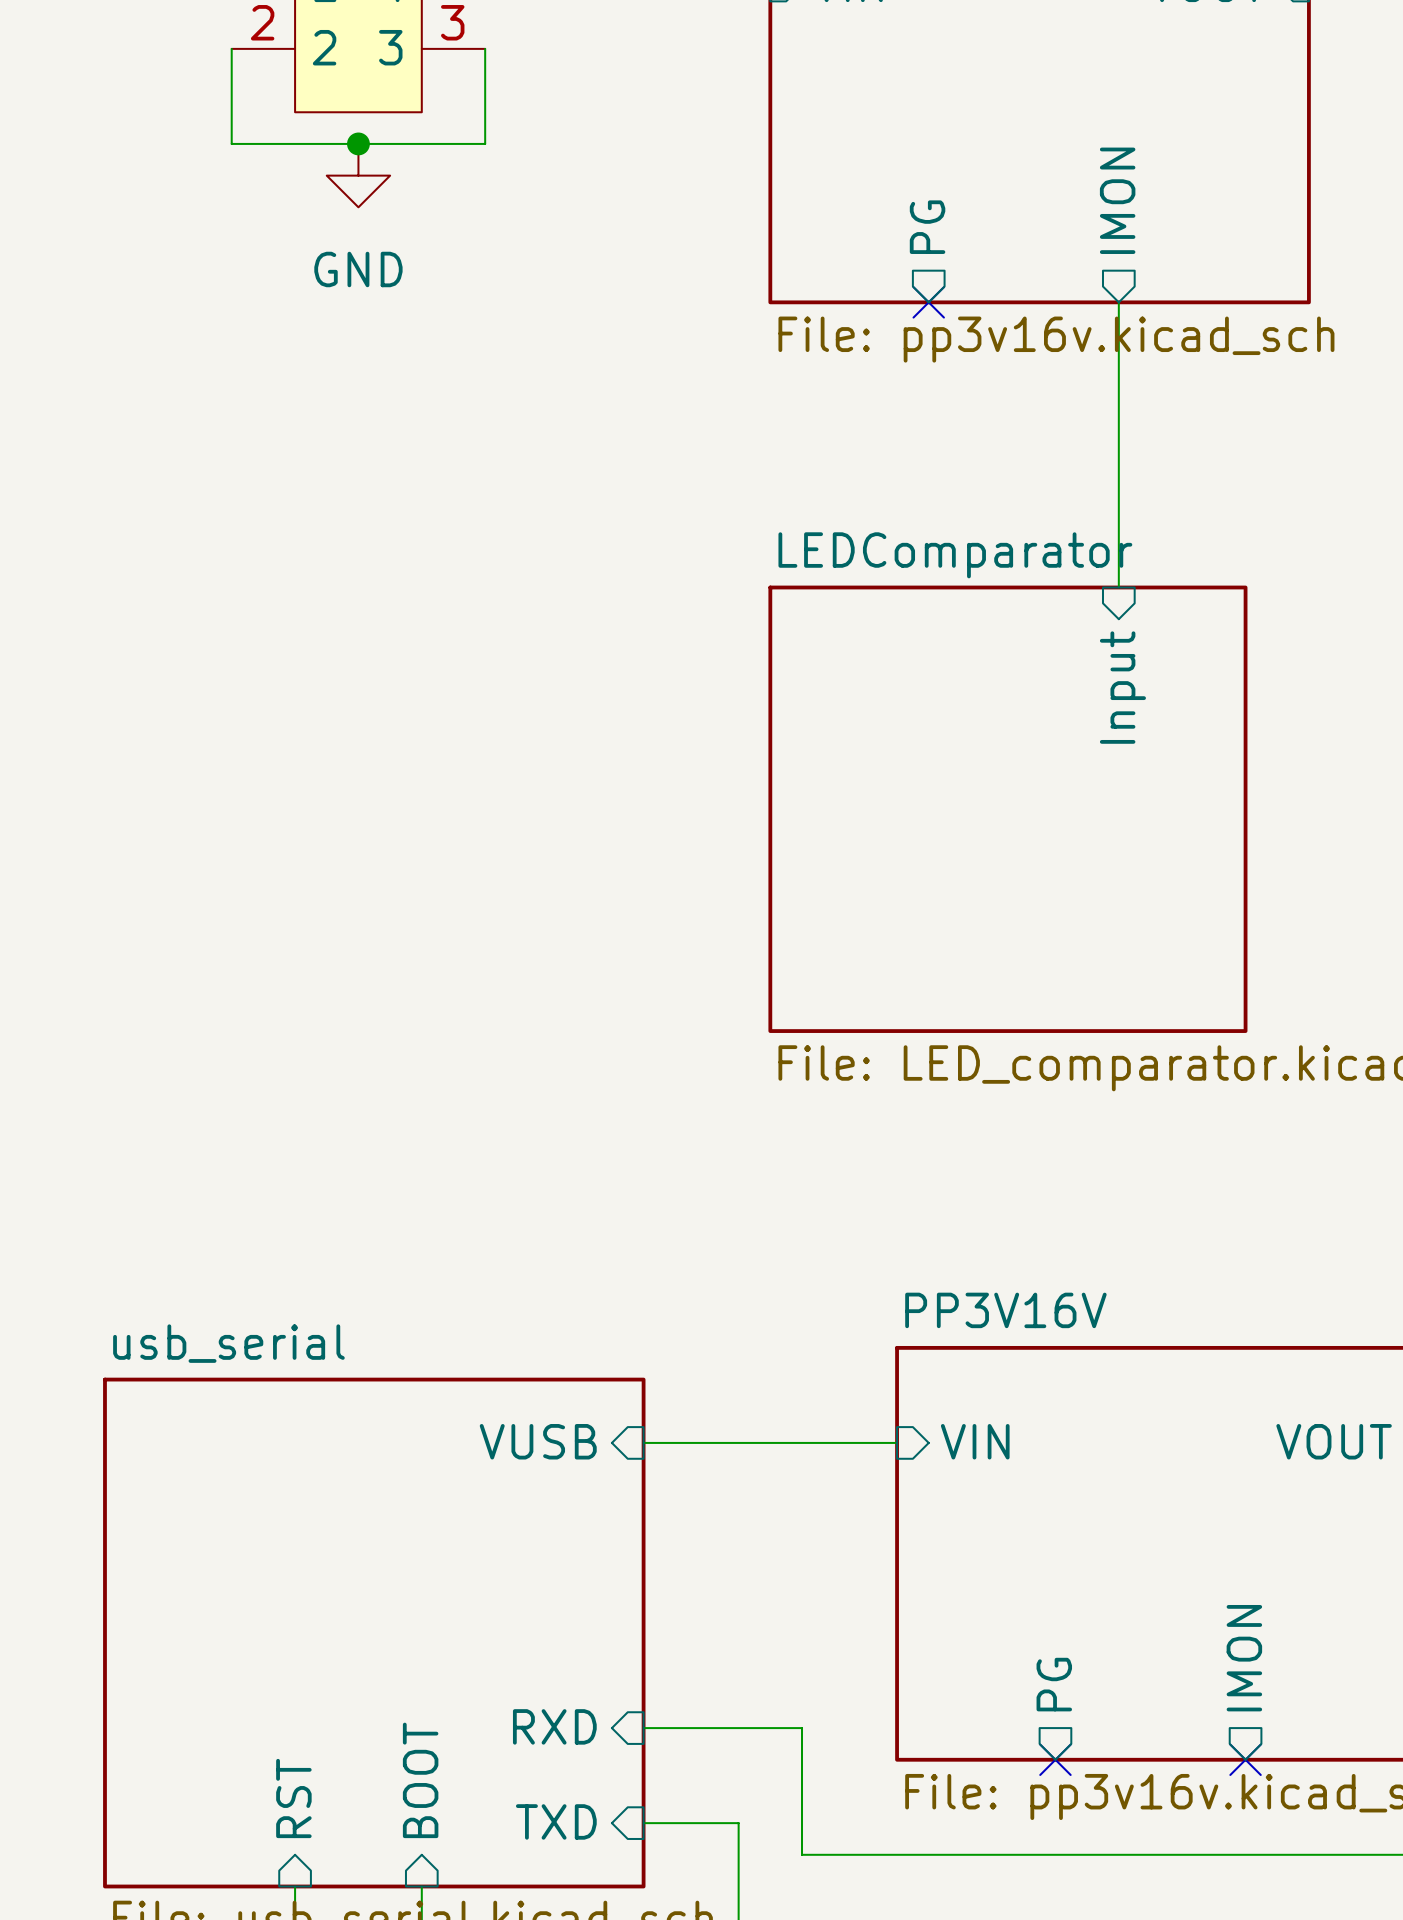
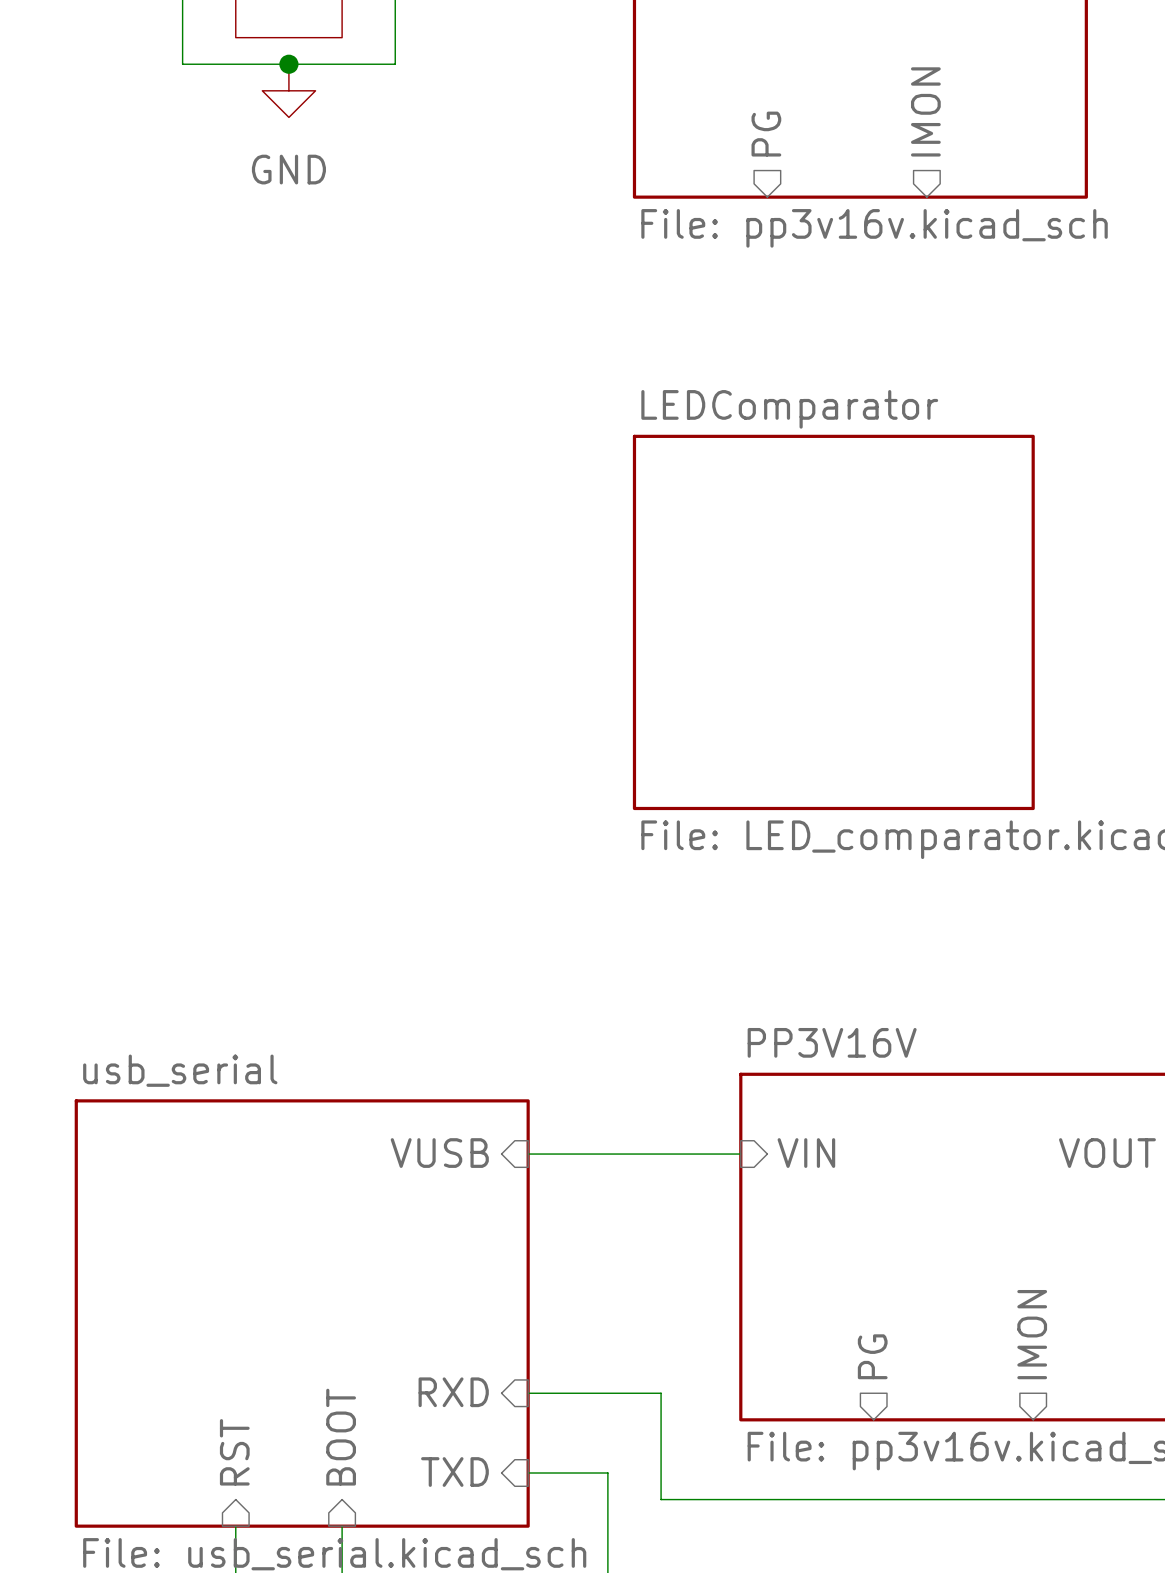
no-connect mark: (928, 302) -> none
wire: (1118, 302) (1118, 587) -> none
sheet pin: Input (1122, 687) -> none
no-connect mark: (1055, 1759) -> none
no-connect mark: (1245, 1759) -> none

